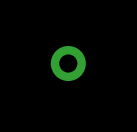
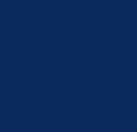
part: (68, 63) -> none

